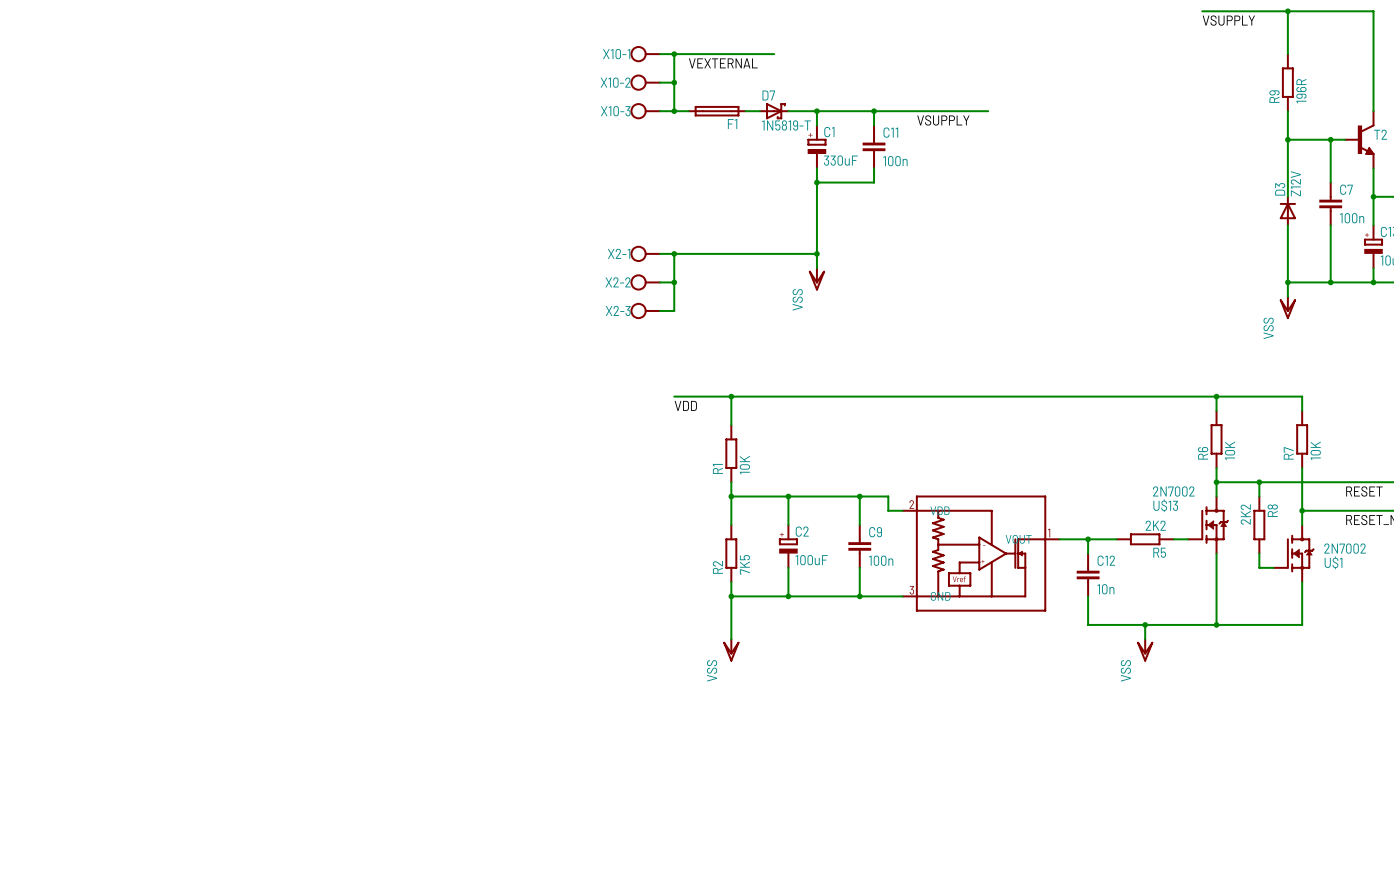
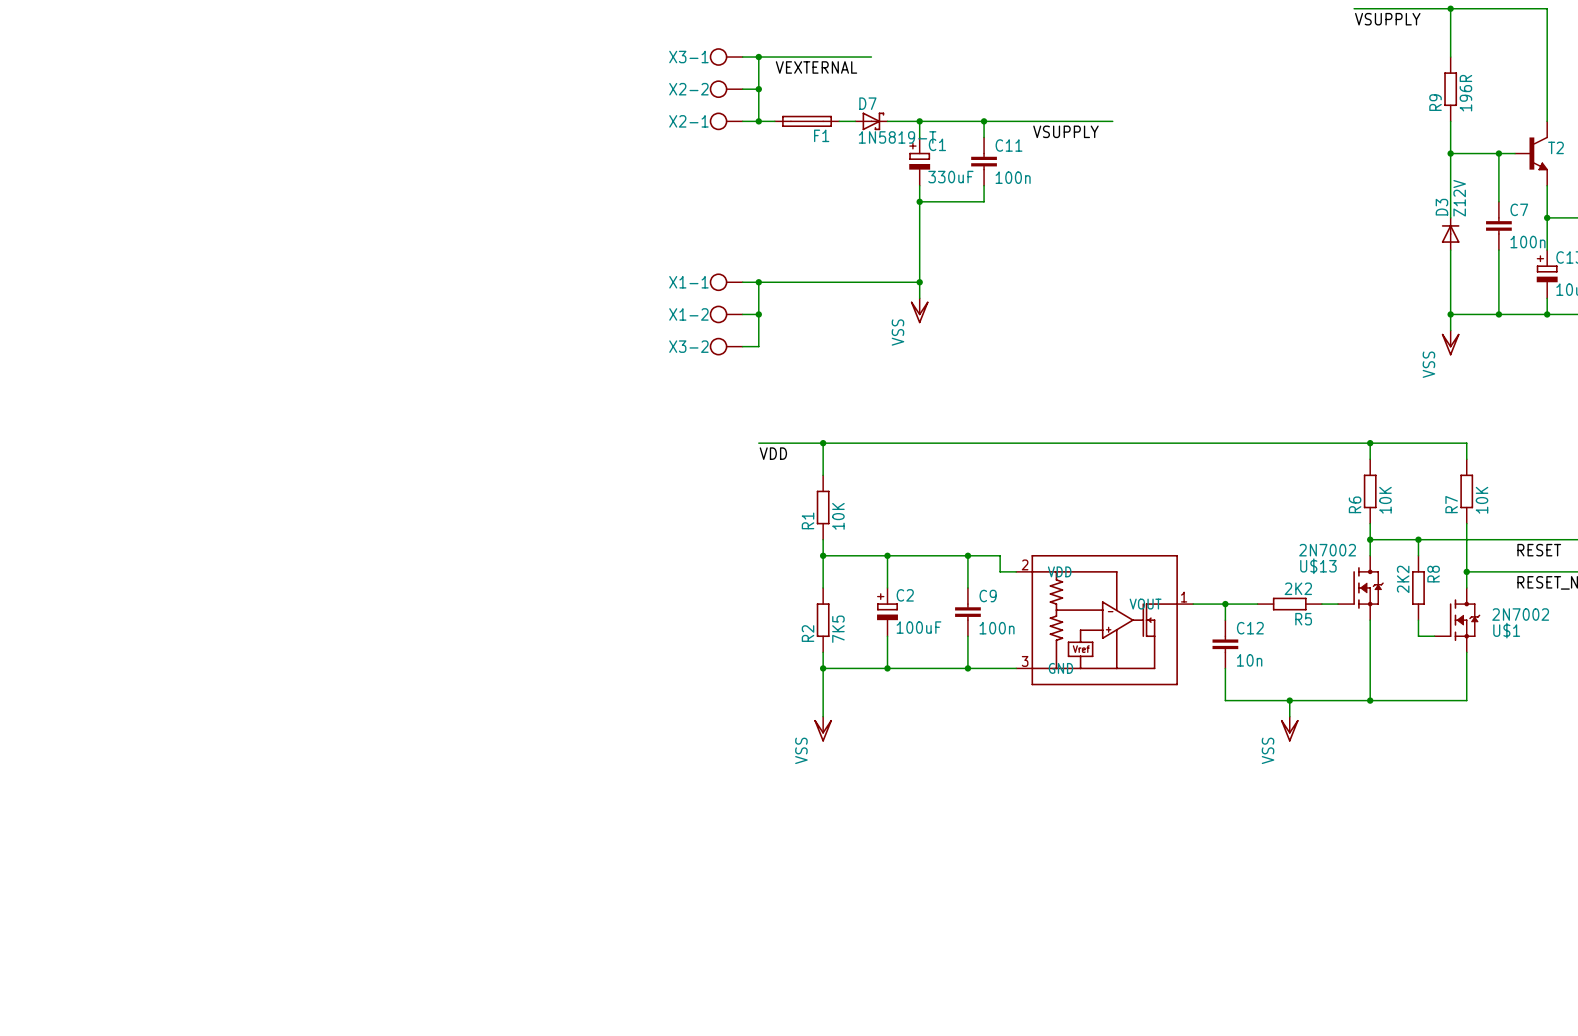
X10-1 name: X10-1 (616, 54) -> X3-1 (688, 57)
X10-2 name: X10-2 (615, 82) -> X2-2 (688, 89)
X10-3 name: X10-3 (615, 111) -> X2-1 (688, 121)
X2-1 name: X2-1 (619, 253) -> X1-1 (688, 282)
X2-2 name: X2-2 (618, 282) -> X1-2 (688, 314)
X2-3 name: X2-3 (618, 310) -> X3-2 (688, 346)

